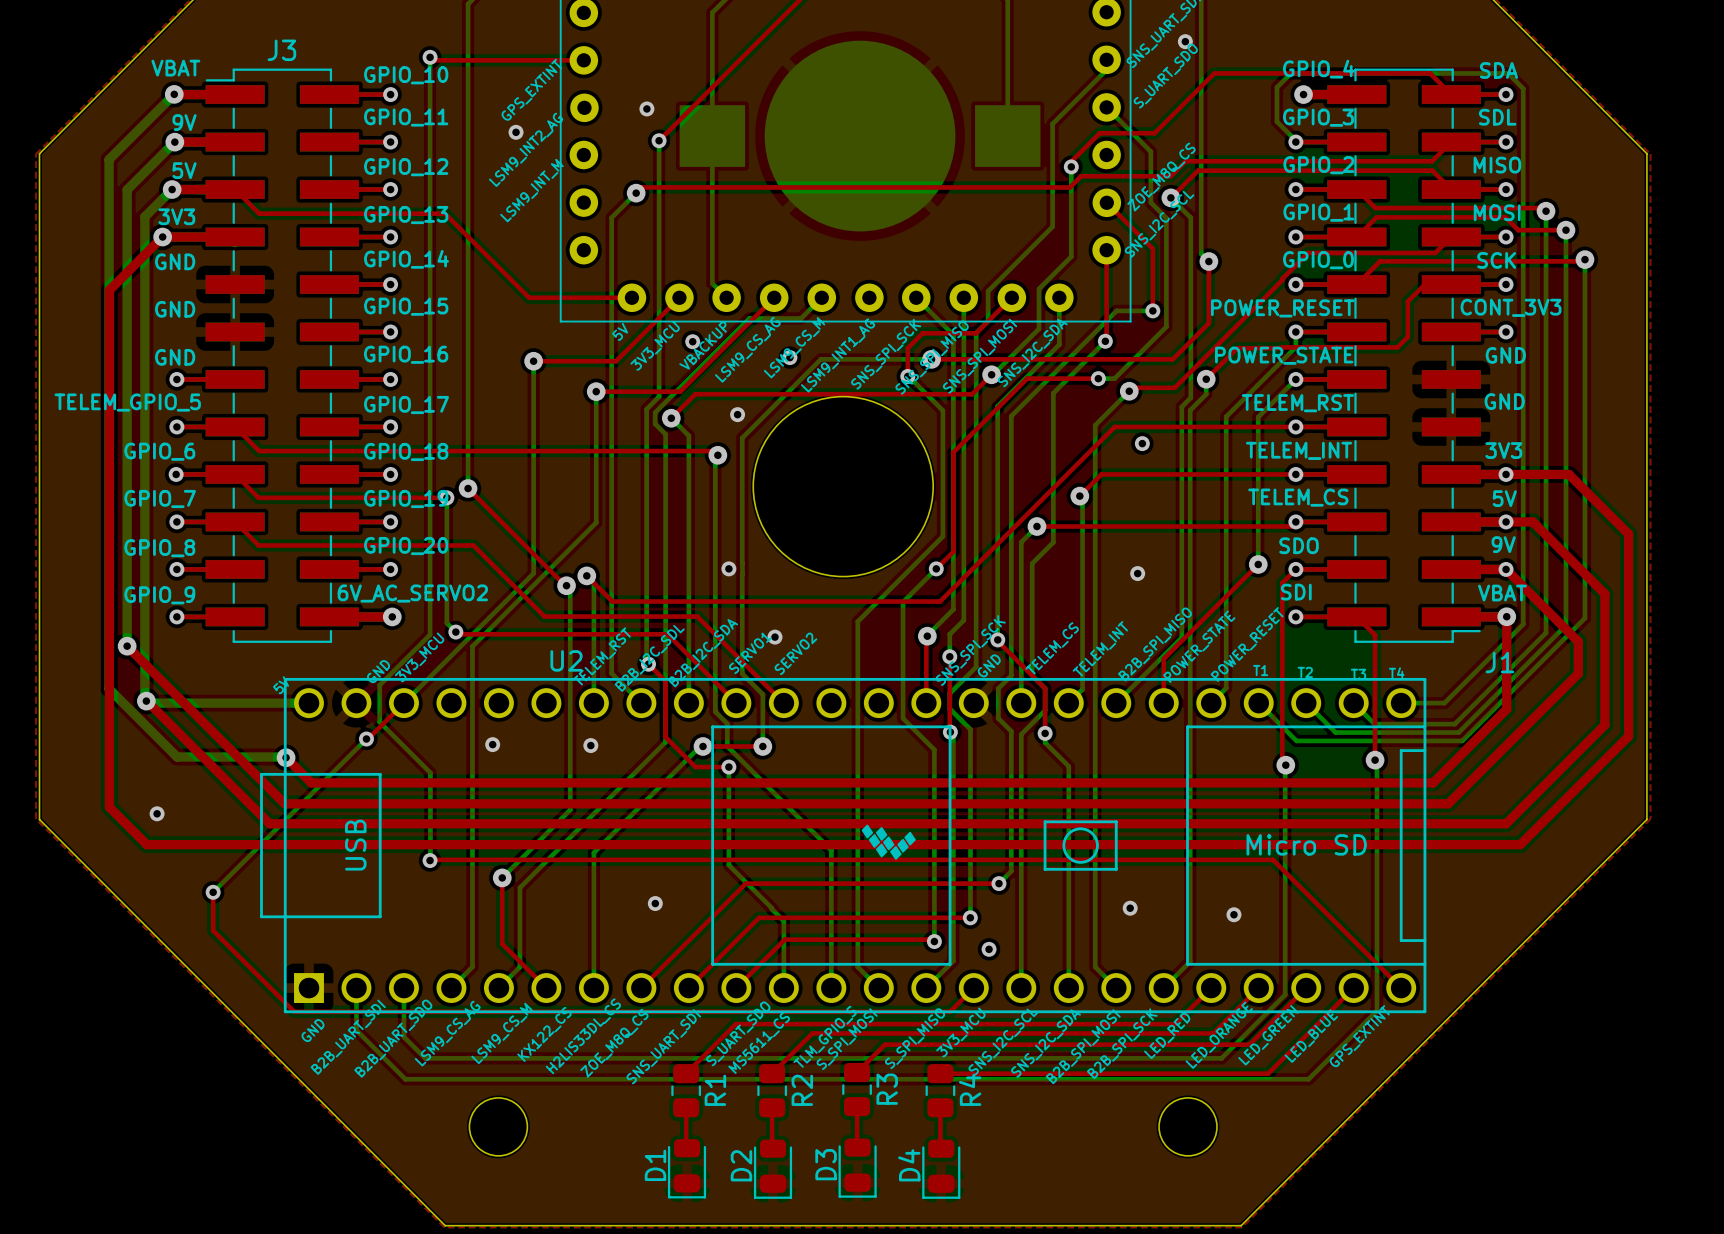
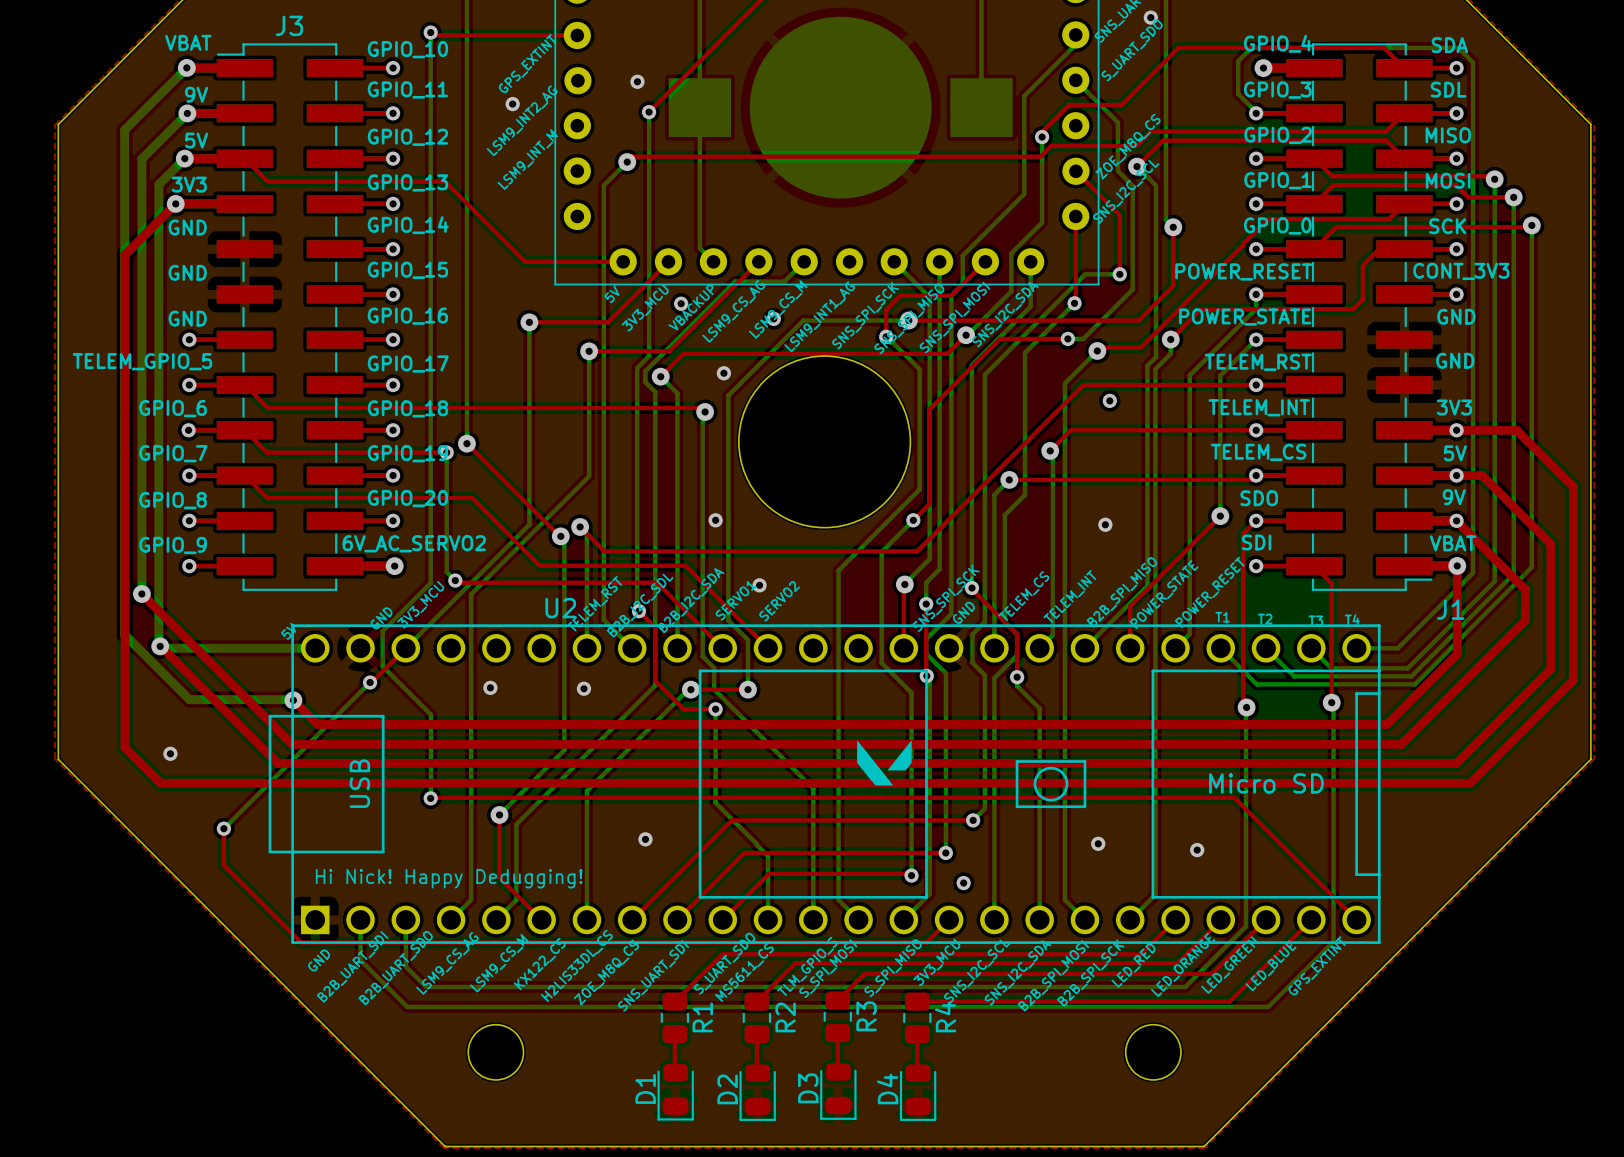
U2 footprint: [260, 677, 1427, 1014] -> [268, 624, 1381, 944]
drawing: none -> [857, 740, 912, 786]
text: none -> Hi Nick! Happy Dedugging! (449, 878)

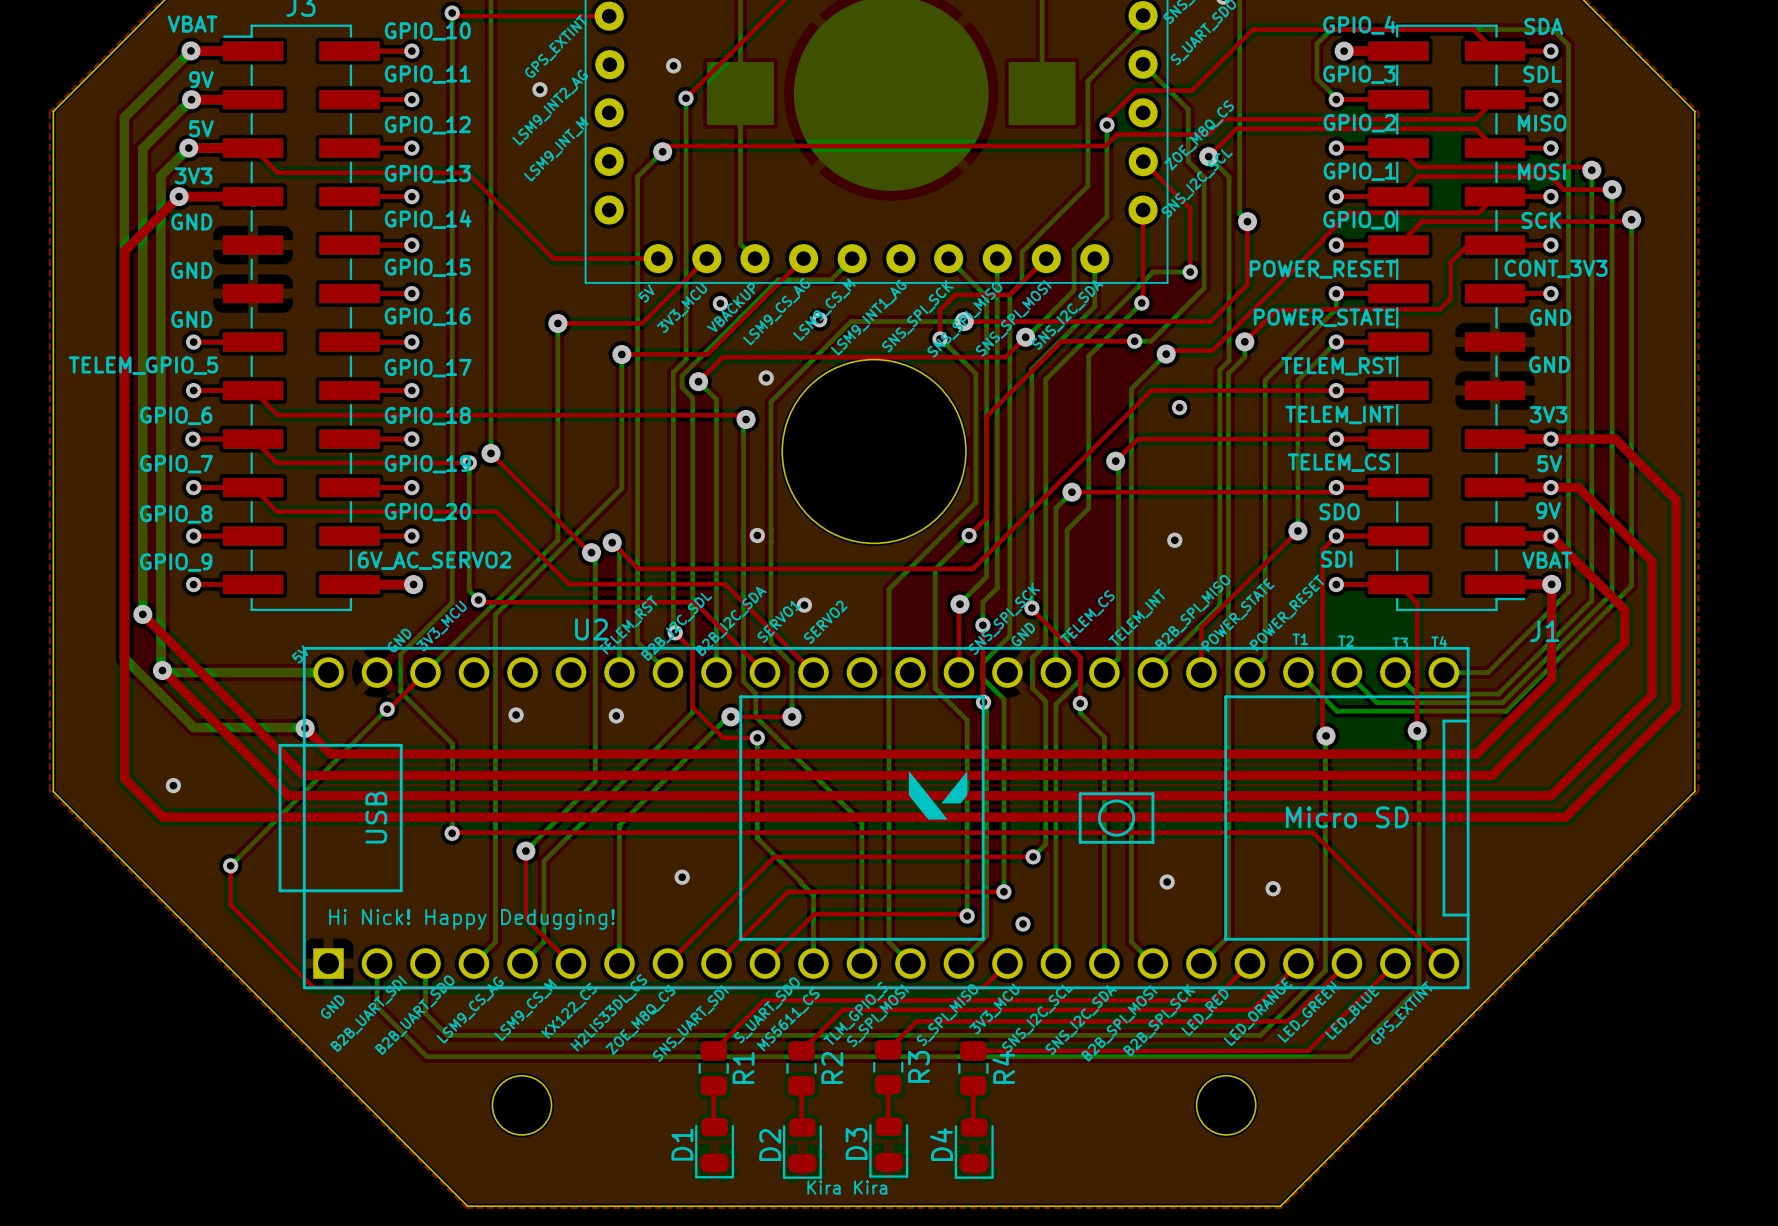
text: none -> Kira Kira (847, 1187)

